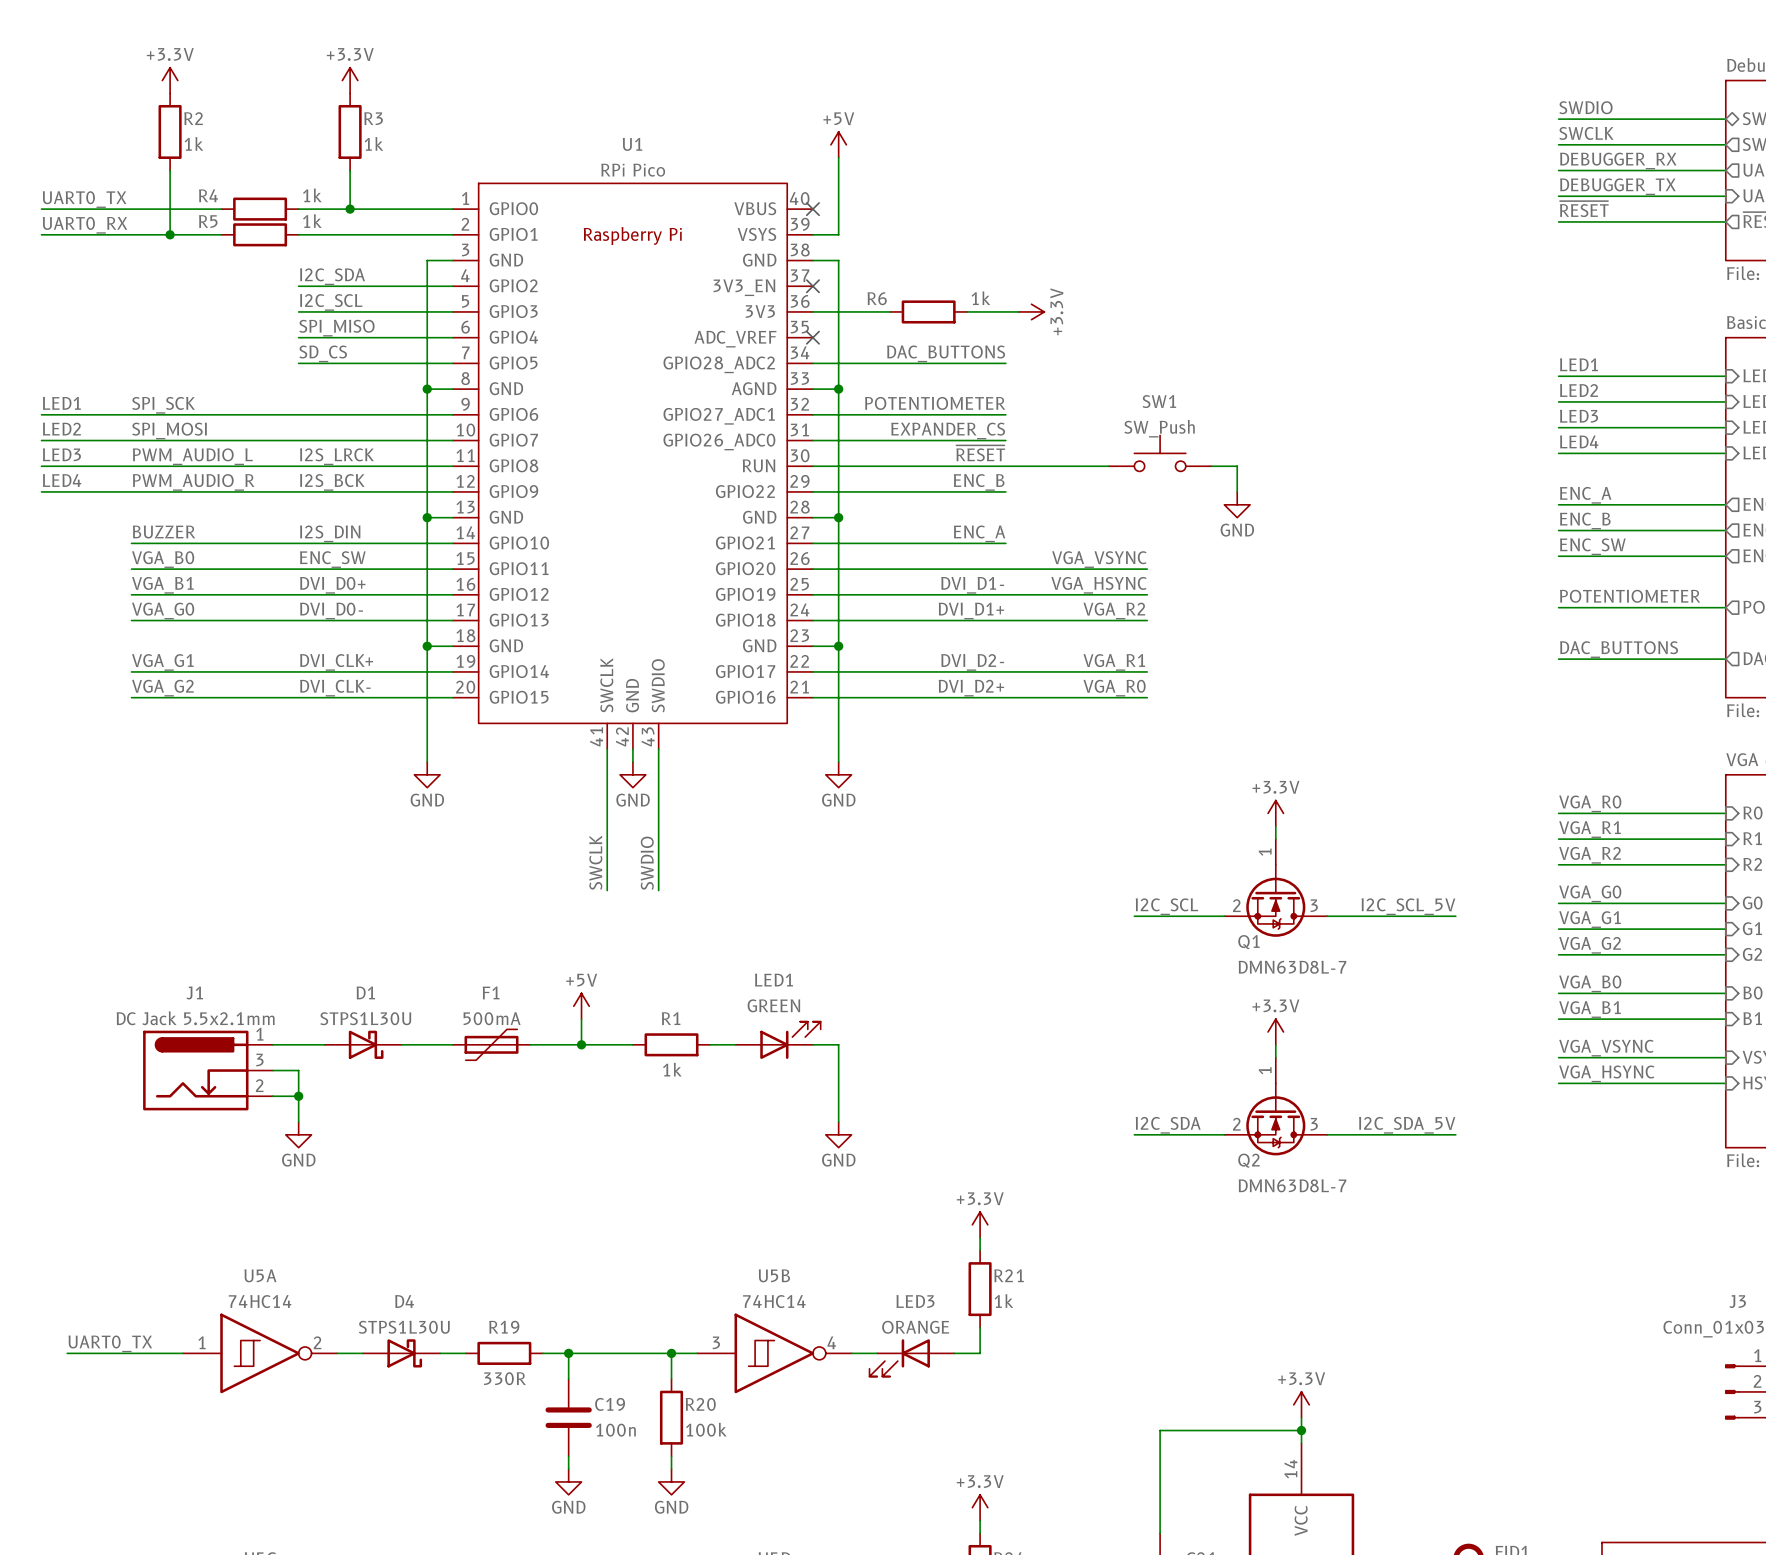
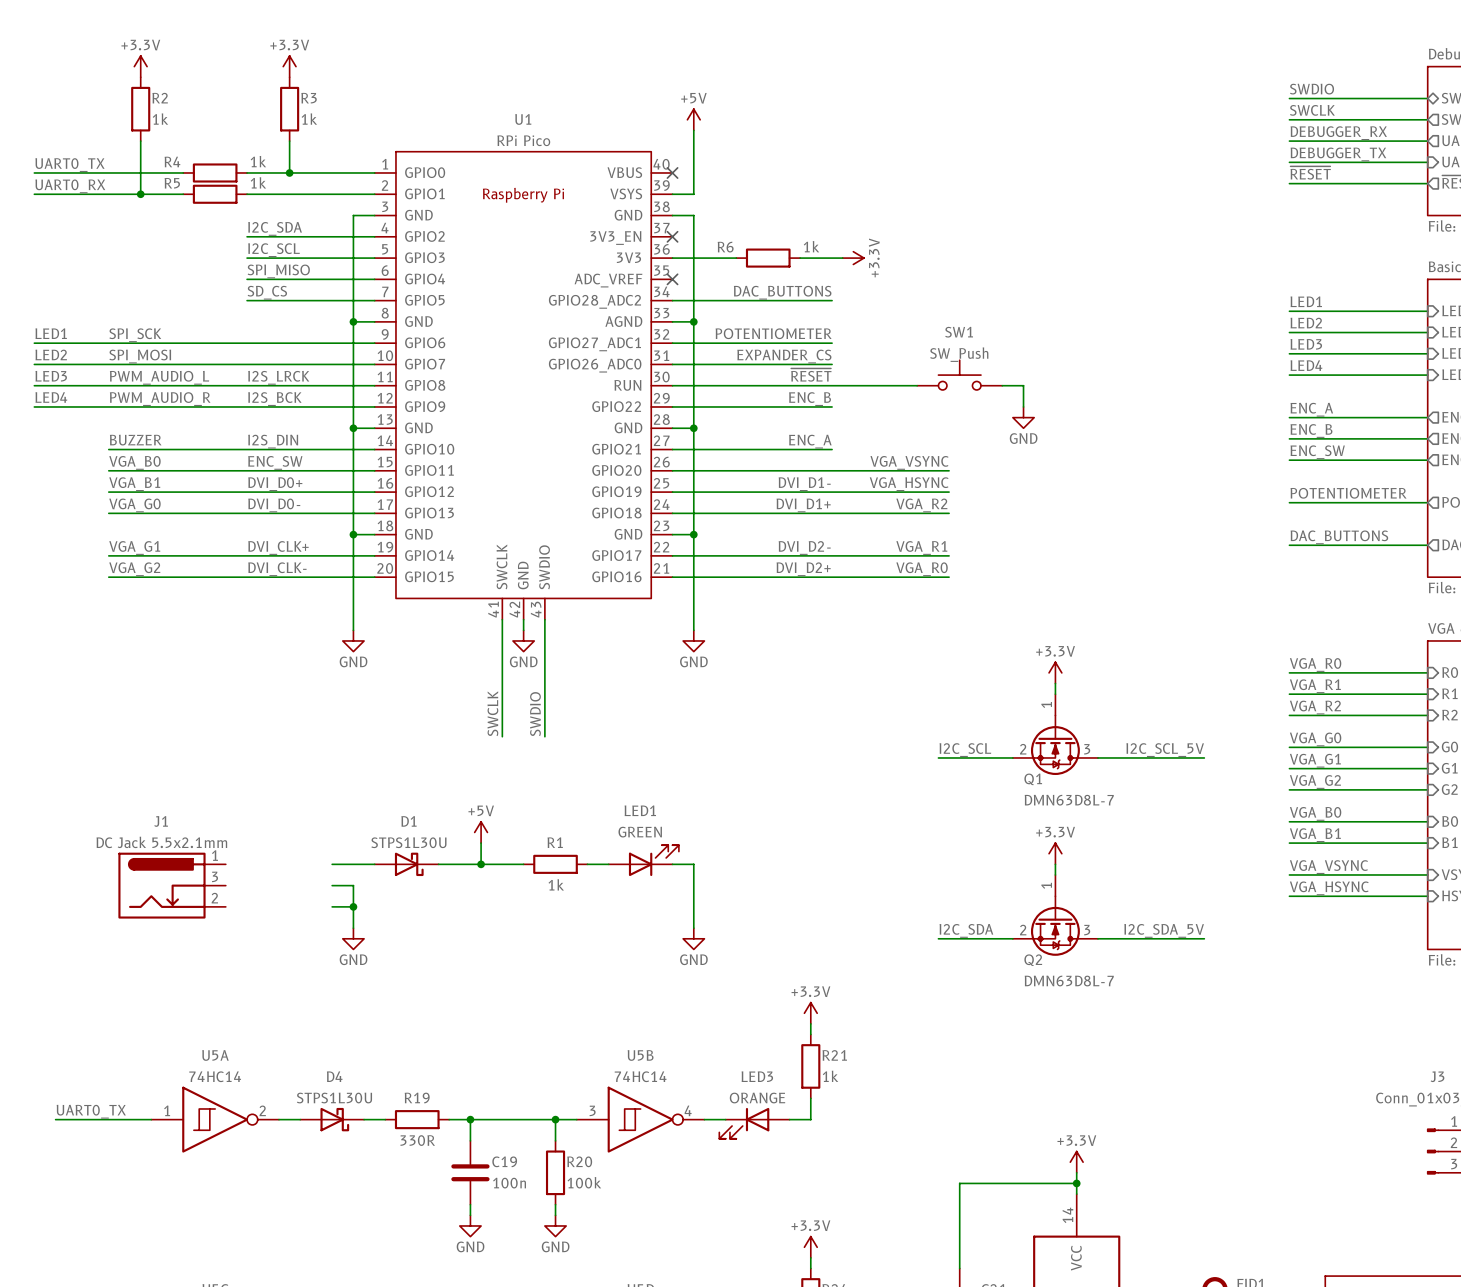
wire: (272, 1044) (324, 1044) -> none
D1 position: (362, 1044) -> (406, 864)
F1: 500mA (491, 1044) -> none
wire: (272, 1070) (298, 1070) (298, 1121) -> (332, 885) (353, 885) (353, 928)
wire: (272, 1096) (298, 1096) -> (332, 906) (353, 906)
junction: (298, 1096) -> none
junction: none -> (353, 906)
power symbol position: GND (298, 1134) -> GND (353, 938)

